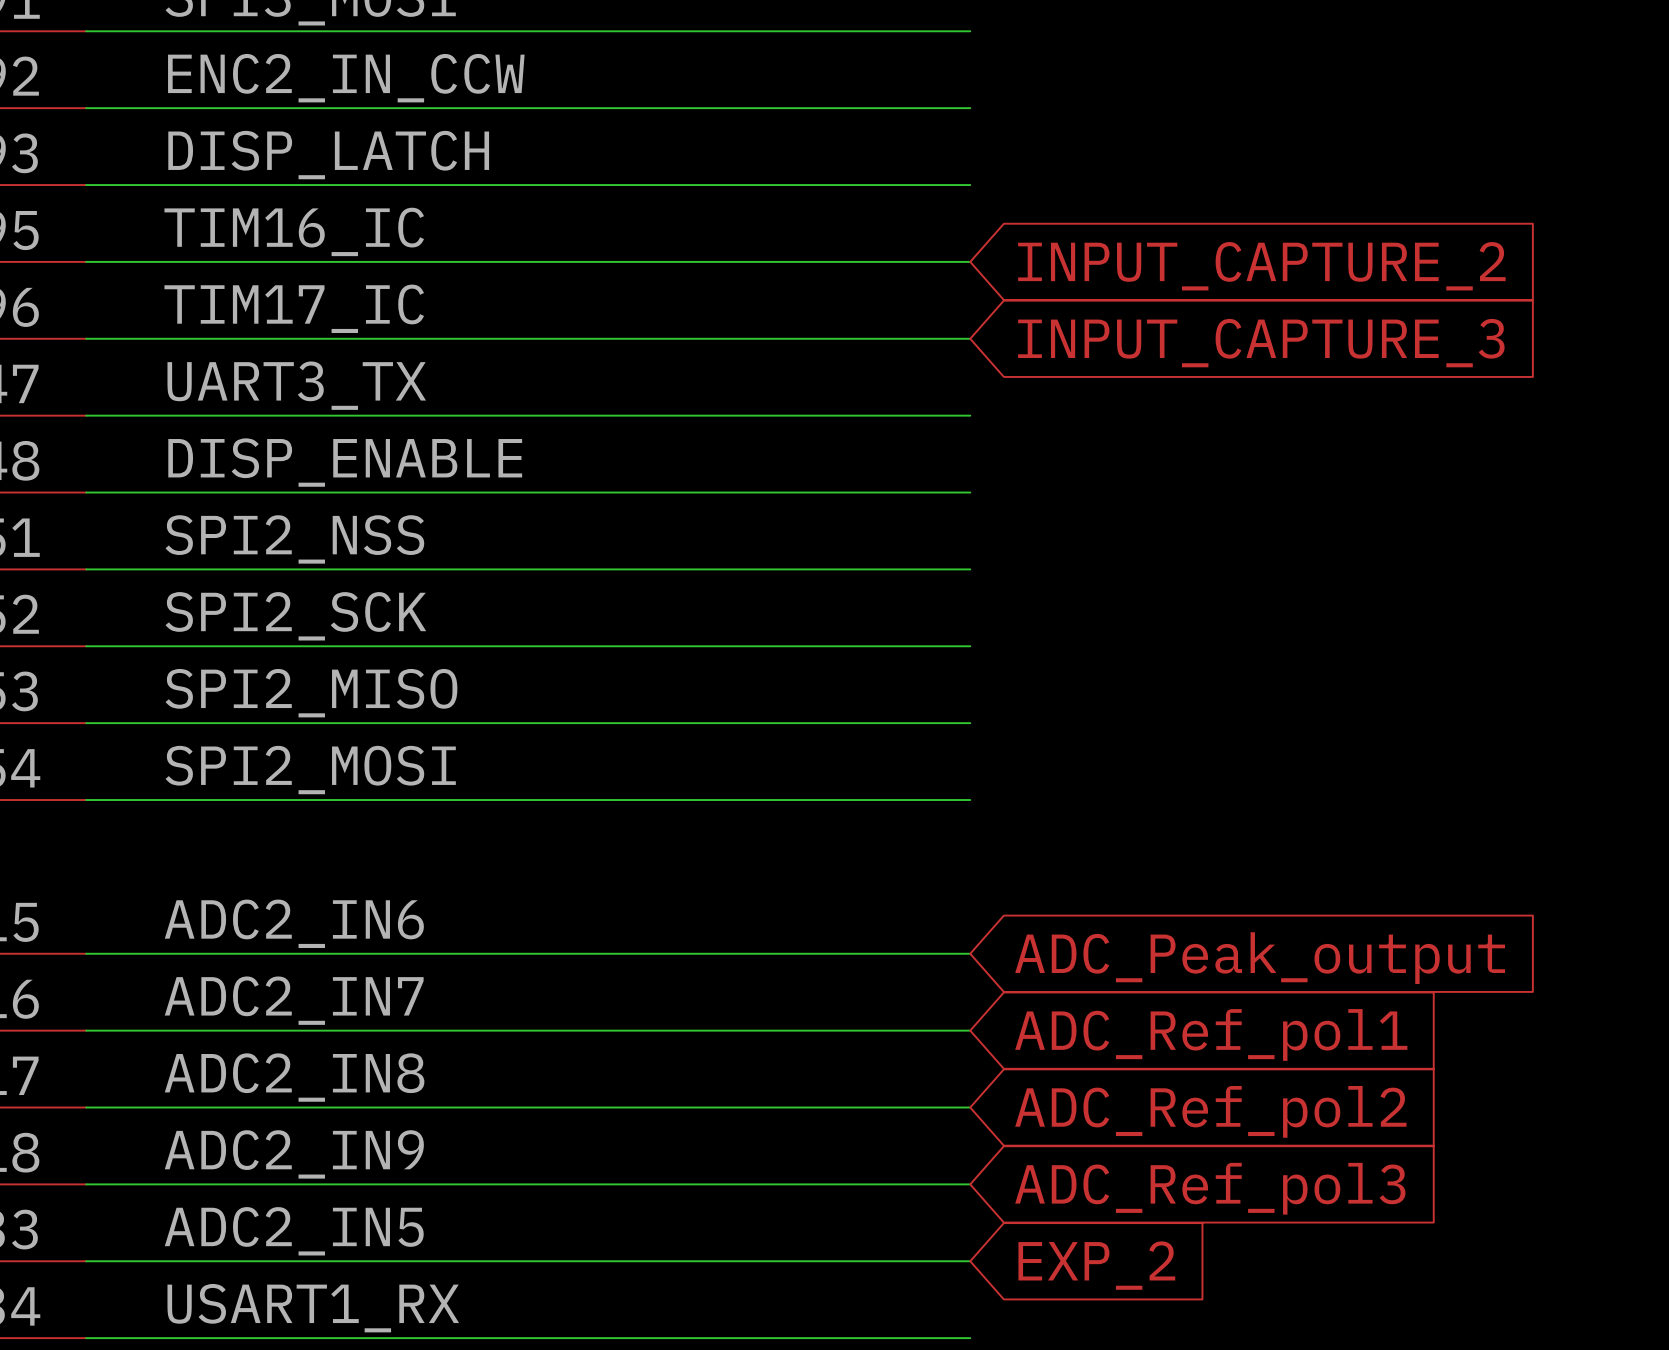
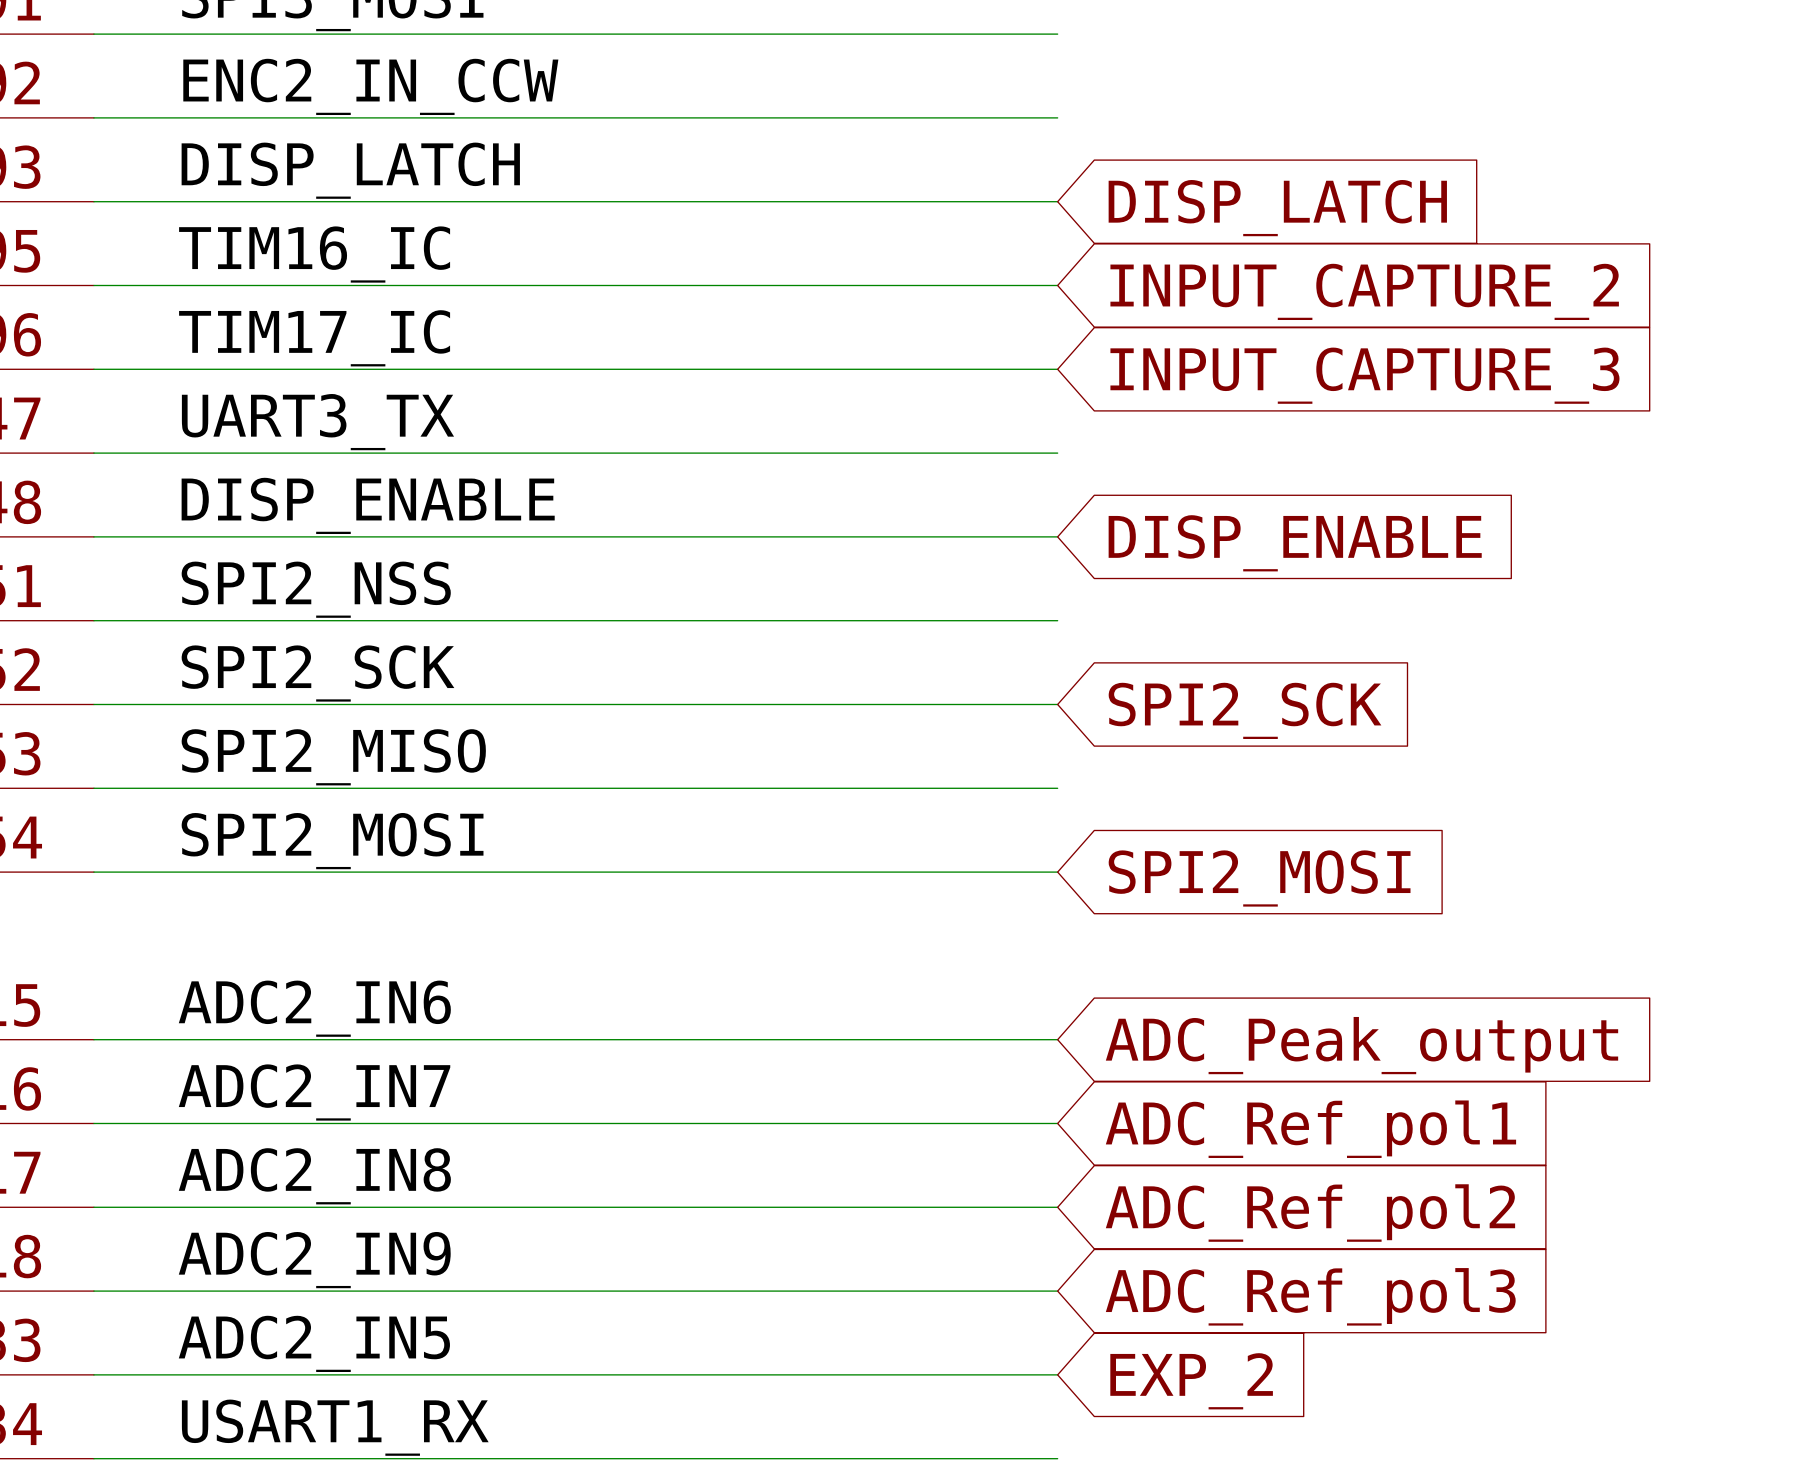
global label: none -> DISP_LATCH (1277, 208)
global label: none -> DISP_ENABLE (1295, 543)
global label: none -> SPI2_SCK (1245, 710)
global label: none -> SPI2_MOSI (1259, 878)

